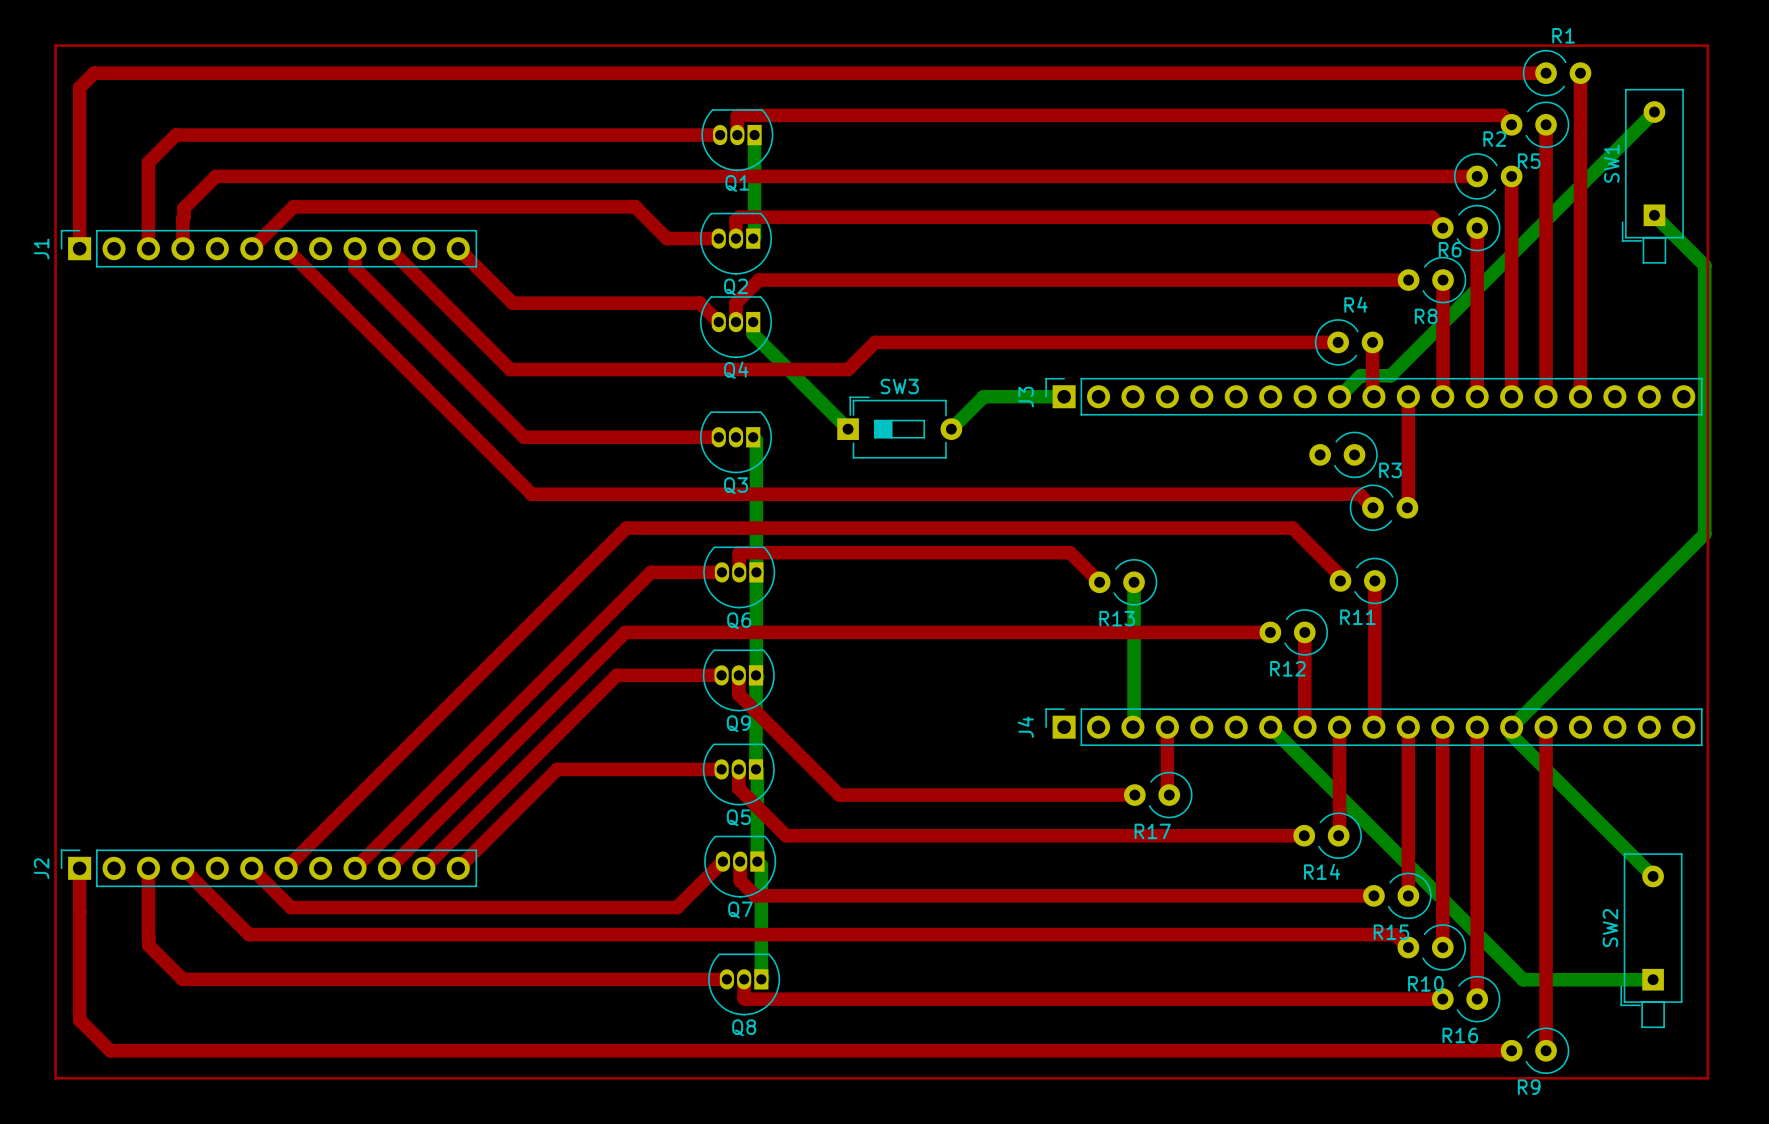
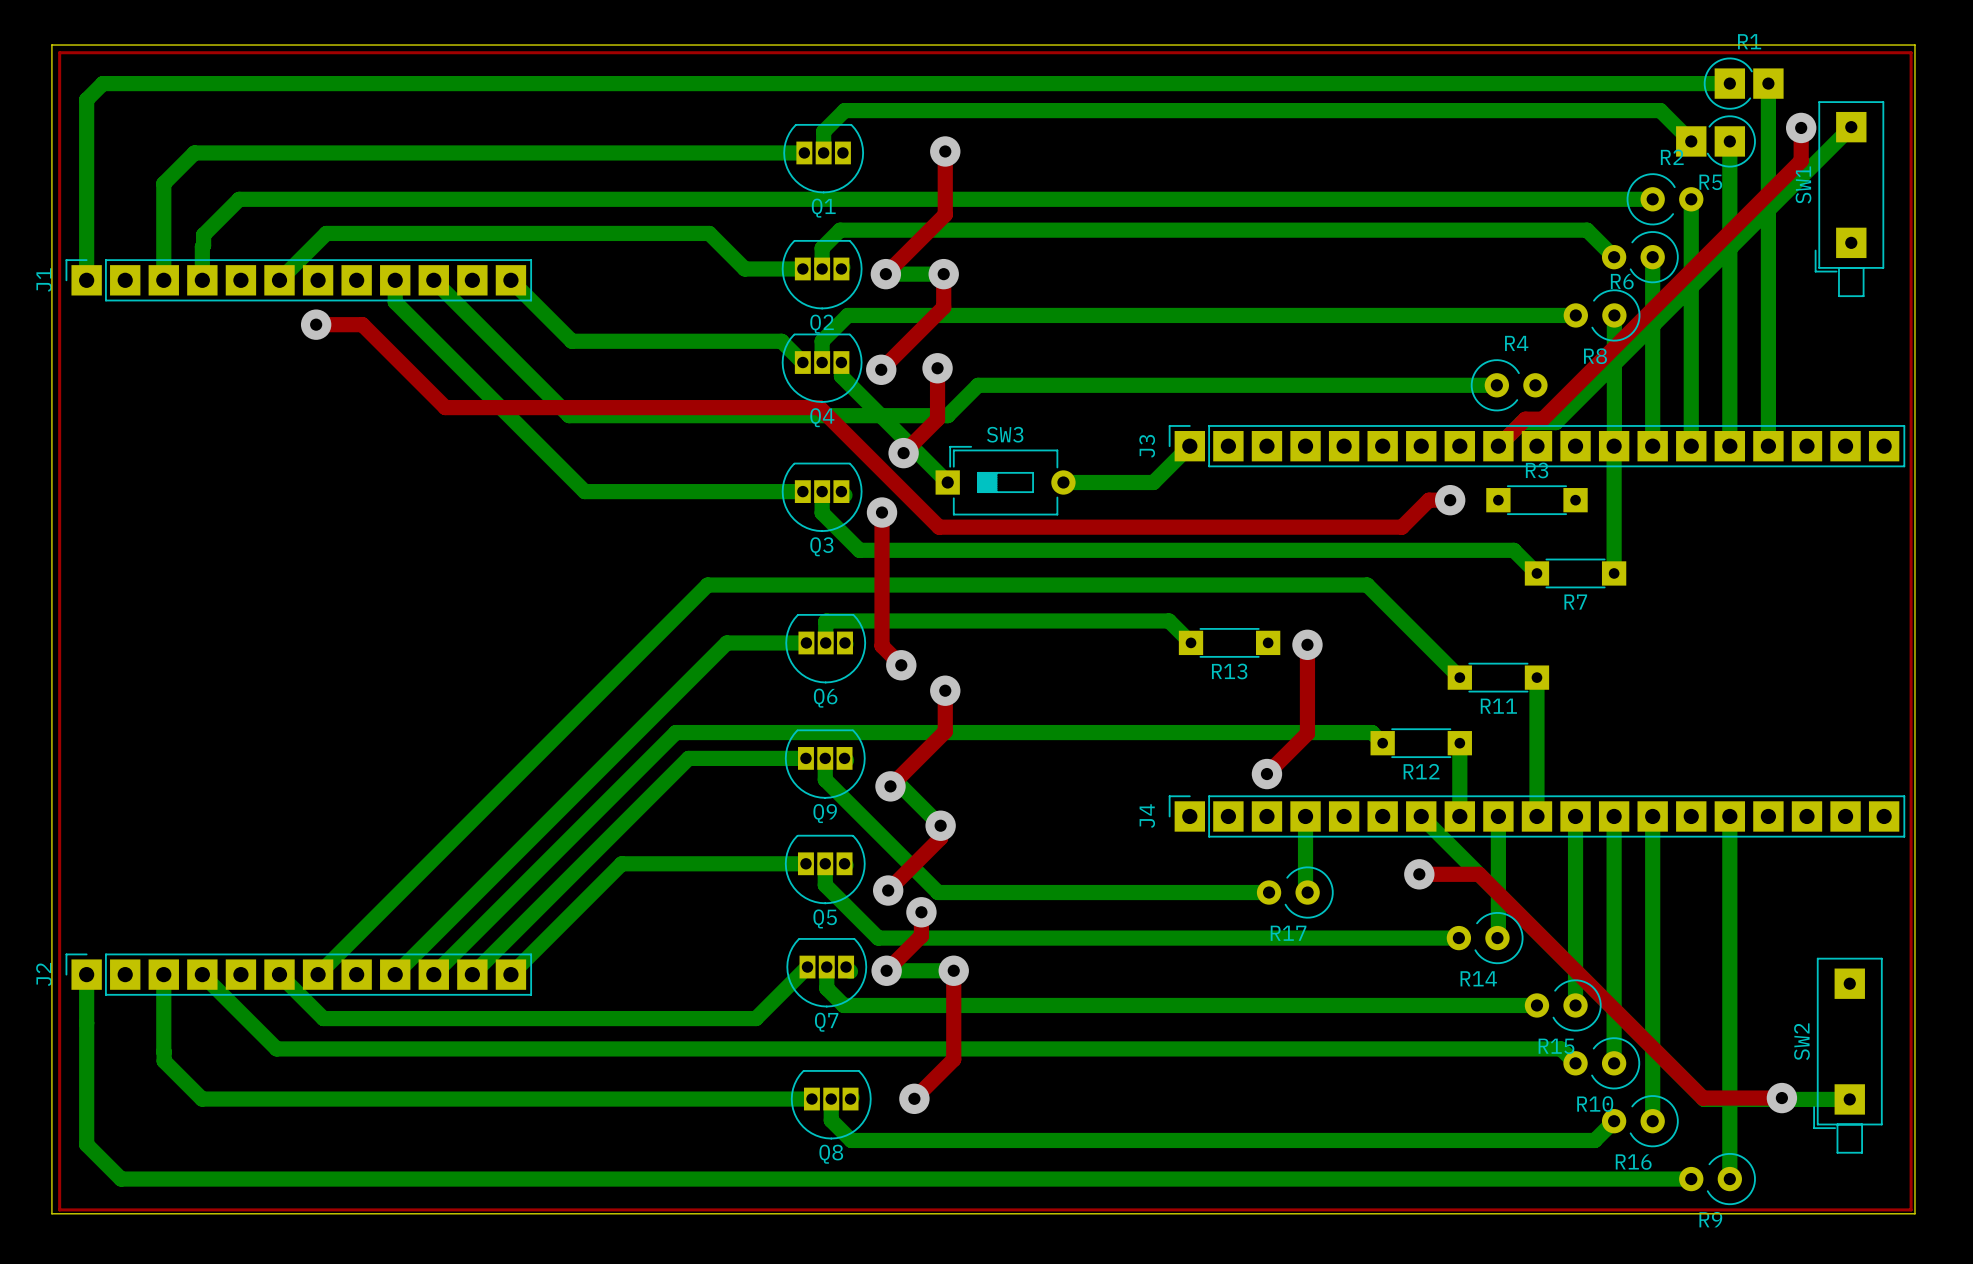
board edge: none -> (51, 45) (1914, 45) (1914, 1213) (51, 1213) (51, 45)
R1 footprint: [1522, 49, 1592, 97] -> [1703, 57, 1784, 110]
top track: (1546, 73) (94, 73) (79, 87) (79, 248) -> none
bottom track: none -> (1729, 83) (102, 83) (86, 99) (86, 280)
top track: (1580, 73) (1580, 396) -> none
bottom track: none -> (1768, 83) (1768, 446)
SW1 footprint: [1621, 88, 1684, 264] -> [1814, 101, 1885, 298]
R5 footprint: [1500, 101, 1570, 149] -> [1676, 115, 1756, 168]
Q1 footprint: [701, 109, 774, 172] -> [783, 123, 865, 194]
top track: none -> (1801, 127) (1801, 160) (1542, 419) (1525, 419) (1498, 446)
via: none -> (1801, 127)
top track: (1511, 124) (1502, 115) (737, 115) (737, 135) -> none
bottom track: none -> (1691, 141) (1660, 110) (844, 110) (823, 131) (823, 152)
top track: (1546, 124) (1546, 396) -> none
bottom track: none -> (1729, 141) (1729, 446)
top track: none -> (945, 151) (945, 214) (885, 274)
via: none -> (945, 151)
top track: (720, 135) (175, 135) (148, 162) (148, 248) -> none
bottom track: none -> (804, 152) (194, 152) (163, 183) (163, 280)
bottom track: (754, 135) (754, 237) -> none
top track: (1477, 176) (215, 176) (184, 208) (182, 248) -> none
bottom track: none -> (1652, 199) (239, 199) (203, 234) (202, 280)
top track: (1511, 176) (1511, 396) -> none
bottom track: none -> (1691, 199) (1691, 446)
Q2 footprint: [699, 212, 773, 275] -> [781, 239, 863, 310]
bottom track: (1654, 215) (1704, 265) (1704, 534) (1511, 727) (1511, 734) (1653, 876) -> none
top track: (1442, 228) (1431, 217) (738, 217) (736, 220) (736, 238) -> none
bottom track: none -> (1614, 257) (1587, 230) (840, 230) (822, 248) (822, 268)
top track: (1477, 228) (1477, 396) -> none
bottom track: none -> (1652, 257) (1652, 446)
J1 footprint: [60, 229, 478, 268] -> [65, 259, 533, 302]
top track: (718, 238) (667, 238) (635, 206) (293, 206) (251, 248) -> none
bottom track: none -> (802, 268) (744, 268) (709, 233) (326, 233) (279, 280)
bottom track: none -> (885, 274) (943, 274)
via: none -> (885, 274)
top track: none -> (943, 274) (943, 307) (881, 369)
via: none -> (943, 274)
top track: (286, 248) (325, 288) -> (316, 324) (362, 324)
top track: (355, 248) (355, 268) (524, 437) (718, 437) -> none
bottom track: none -> (395, 280) (395, 302) (584, 491) (802, 491)
top track: (389, 248) (510, 369) (848, 369) (875, 342) (1338, 342) -> none
bottom track: none -> (433, 280) (569, 415) (947, 415) (978, 385) (1496, 385)
top track: (458, 248) (512, 303) (699, 303) (718, 322) -> none
bottom track: none -> (510, 280) (571, 341) (781, 341) (802, 362)
top track: (1408, 280) (758, 280) (736, 303) (736, 322) -> none
bottom track: none -> (1575, 315) (847, 315) (822, 341) (822, 362)
top track: (1443, 280) (1443, 396) -> none
bottom track: none -> (1614, 315) (1614, 445)
via: none -> (316, 324)
Q4 footprint: [699, 296, 773, 359] -> [781, 333, 863, 403]
top track: none -> (937, 368) (937, 419) (903, 453)
via: none -> (937, 368)
via: none -> (881, 369)
top track: (1372, 342) (1372, 395) -> none
top track: (399, 362) (531, 494) (1359, 494) (1372, 507) -> (445, 407) (819, 407) (939, 527) (1401, 527) (1428, 500) (1450, 500)
J3 footprint: [1045, 377, 1703, 416] -> [1168, 425, 1906, 468]
bottom track: (1064, 396) (983, 396) (951, 429) -> (1189, 446) (1153, 482) (1063, 482)
top track: (1408, 396) (1407, 507) -> none
bottom track: none -> (1614, 446) (1614, 573)
via: none -> (903, 453)
Q3 footprint: [699, 411, 773, 474] -> [781, 462, 863, 533]
bottom track: none -> (822, 491) (822, 512) (859, 550) (1513, 550) (1536, 573)
bottom track: (756, 440) (756, 674) -> none
via: none -> (1450, 500)
part: (1343, 454) -> none
top track: none -> (882, 512) (882, 645) (901, 665)
via: none -> (882, 512)
R3 footprint: [1349, 484, 1419, 532] -> [1486, 485, 1588, 516]
R7: none -> (1575, 573)
Q6 footprint: [703, 546, 776, 609] -> [785, 613, 867, 684]
R11 footprint: [1329, 557, 1399, 605] -> [1447, 662, 1550, 693]
R13 footprint: [1088, 559, 1158, 606] -> [1178, 628, 1281, 658]
top track: (721, 572) (650, 572) (355, 868) -> none
bottom track: none -> (806, 642) (726, 642) (395, 974)
top track: (739, 572) (739, 552) (1070, 552) (1099, 582) -> none
bottom track: none -> (1191, 642) (1169, 620) (826, 620) (825, 642)
top track: none -> (1307, 644) (1307, 733) (1266, 774)
via: none -> (1307, 644)
top track: (1340, 580) (1340, 575) (1292, 528) (626, 528) (286, 868) -> none
top track: (1374, 580) (1373, 727) -> none
bottom track: (1134, 582) (1134, 726) -> none
via: none -> (901, 665)
bottom track: none -> (1459, 677) (1367, 585) (707, 585) (318, 974)
bottom track: none -> (1536, 677) (1536, 816)
R12 footprint: [1259, 609, 1329, 656] -> [1370, 728, 1472, 759]
top track: none -> (945, 690) (945, 731) (890, 786)
via: none -> (945, 690)
top track: (1270, 632) (625, 632) (389, 868) -> none
top track: (1304, 632) (1305, 727) -> none
Q9 footprint: [702, 649, 775, 712] -> [784, 729, 866, 799]
bottom track: none -> (1382, 743) (1372, 732) (675, 732) (433, 974)
bottom track: none -> (1459, 743) (1459, 816)
top track: (721, 675) (616, 675) (423, 868) -> none
bottom track: none -> (805, 758) (688, 758) (472, 974)
top track: (738, 675) (738, 694) (839, 795) (1134, 795) -> none
bottom track: none -> (825, 758) (825, 779) (938, 892) (1269, 892)
bottom track: (756, 675) (756, 769) -> none
via: none -> (1266, 774)
bottom track: none -> (890, 786) (901, 786) (940, 825)
via: none -> (890, 786)
J4 footprint: [1045, 708, 1703, 747] -> [1168, 795, 1906, 838]
top track: (1167, 727) (1167, 793) -> none
bottom track: none -> (1305, 816) (1305, 890)
top track: (1339, 727) (1339, 834) -> none
bottom track: none -> (1498, 816) (1498, 937)
top track: (1408, 727) (1408, 895) -> none
bottom track: none -> (1575, 816) (1575, 1005)
top track: (1442, 727) (1442, 947) -> none
bottom track: none -> (1614, 816) (1614, 1063)
top track: (1477, 727) (1477, 999) -> none
bottom track: none -> (1652, 816) (1652, 1121)
top track: (1546, 727) (1546, 1050) -> none
bottom track: none -> (1729, 816) (1729, 1179)
top track: none -> (940, 825) (940, 838) (888, 890)
via: none -> (940, 825)
Q5 footprint: [702, 743, 775, 806] -> [784, 834, 866, 905]
top track: (721, 769) (557, 769) (458, 868) -> none
bottom track: none -> (805, 863) (621, 863) (510, 974)
top track: (738, 769) (738, 788) (786, 835) (1304, 835) -> none
bottom track: none -> (825, 863) (825, 885) (878, 938) (1458, 938)
bottom track: (757, 770) (757, 861) -> none
top track: none -> (1419, 874) (1479, 874) (1702, 1098) (1781, 1098)
via: none -> (1419, 874)
via: none -> (888, 890)
top track: none -> (921, 912) (921, 935) (886, 970)
via: none -> (921, 912)
Q7 footprint: [704, 835, 777, 898] -> [786, 938, 868, 1008]
J2 footprint: [60, 849, 478, 888] -> [65, 953, 533, 996]
SW2 footprint: [1620, 853, 1683, 1029] -> [1813, 957, 1883, 1154]
top track: (722, 861) (676, 907) (290, 907) (251, 868) -> none
bottom track: none -> (807, 967) (755, 1018) (323, 1018) (279, 974)
top track: (740, 861) (740, 880) (755, 895) (1373, 895) -> none
bottom track: none -> (826, 967) (826, 988) (843, 1005) (1536, 1005)
bottom track: none -> (886, 970) (953, 970)
via: none -> (886, 970)
top track: none -> (953, 970) (953, 1059) (914, 1098)
via: none -> (953, 970)
bottom track: (761, 865) (761, 979) -> none
top track: (79, 868) (79, 1020) (110, 1050) (1511, 1050) -> none
bottom track: none -> (86, 974) (86, 1144) (121, 1179) (1691, 1179)
top track: (148, 868) (148, 945) (182, 979) (726, 979) -> none
bottom track: none -> (163, 974) (164, 1061) (202, 1099) (811, 1099)
top track: (182, 868) (249, 934) (1395, 934) (1408, 947) -> none
bottom track: none -> (202, 974) (276, 1048) (1561, 1048) (1575, 1063)
Q8 footprint: [708, 953, 781, 1016] -> [790, 1070, 872, 1140]
via: none -> (1781, 1098)
top track: (744, 979) (744, 999) (1442, 999) -> none
bottom track: none -> (831, 1099) (831, 1120) (851, 1140) (1594, 1140) (1614, 1121)
via: none -> (914, 1098)

